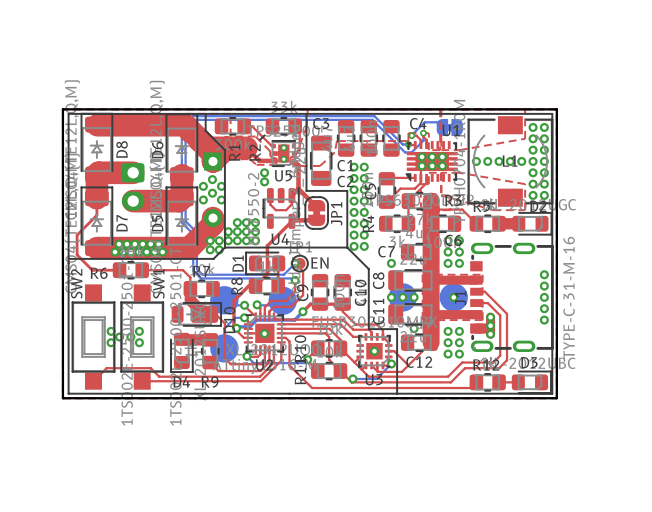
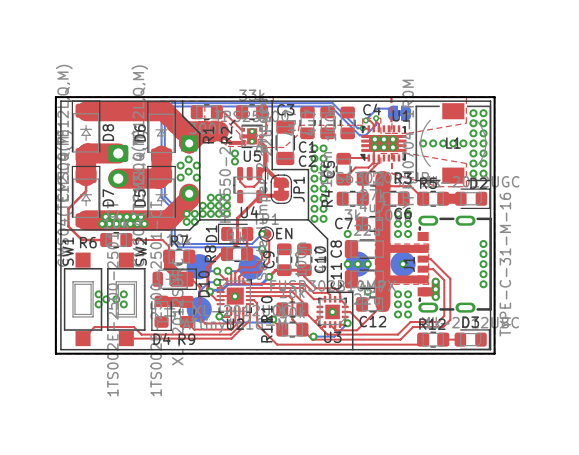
SW2 name: SW2 (76, 283) -> SW1 (68, 251)
SW1 name: SW1 (158, 283) -> SW2 (141, 251)

